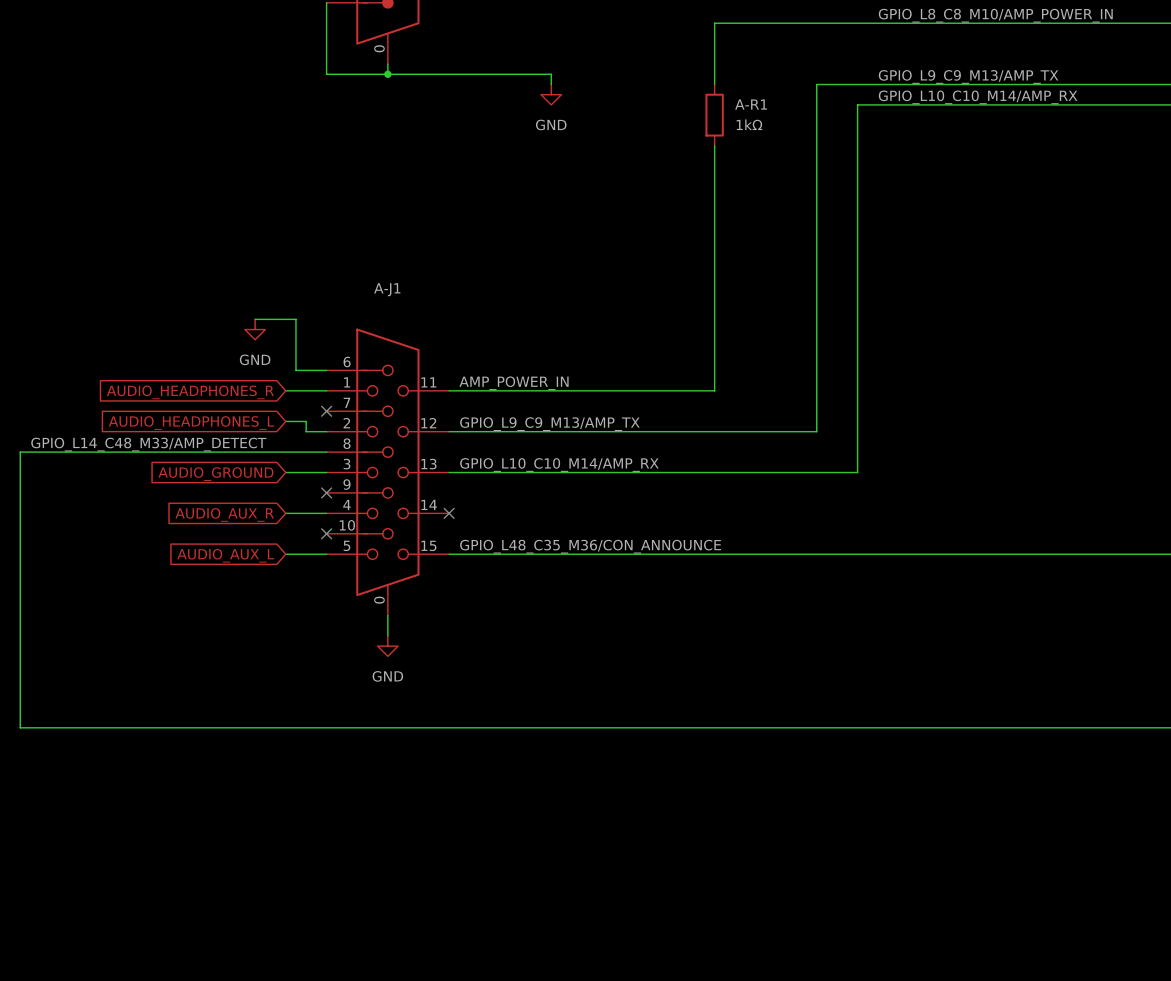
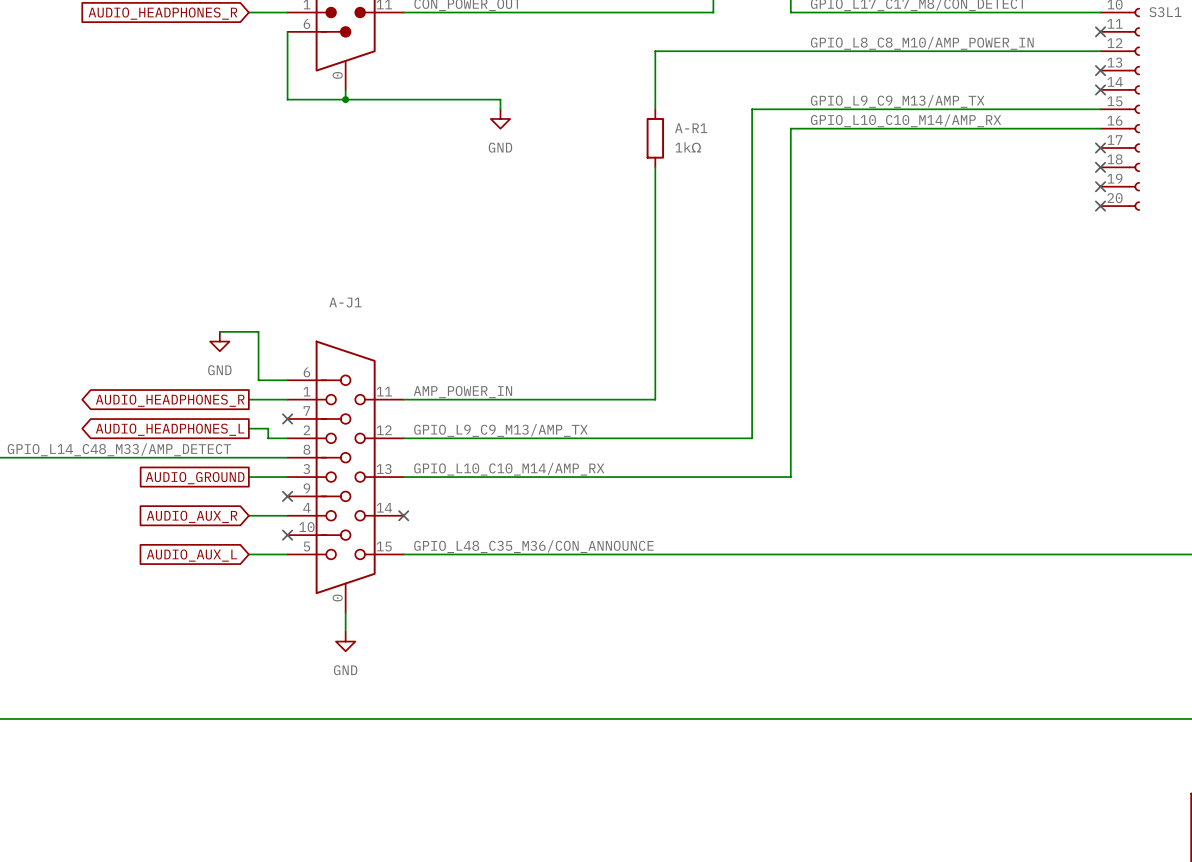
global label shape: input (190, 392) -> output (170, 400)
global label shape: input (191, 423) -> output (170, 429)
global label shape: input (215, 474) -> passive (195, 478)

